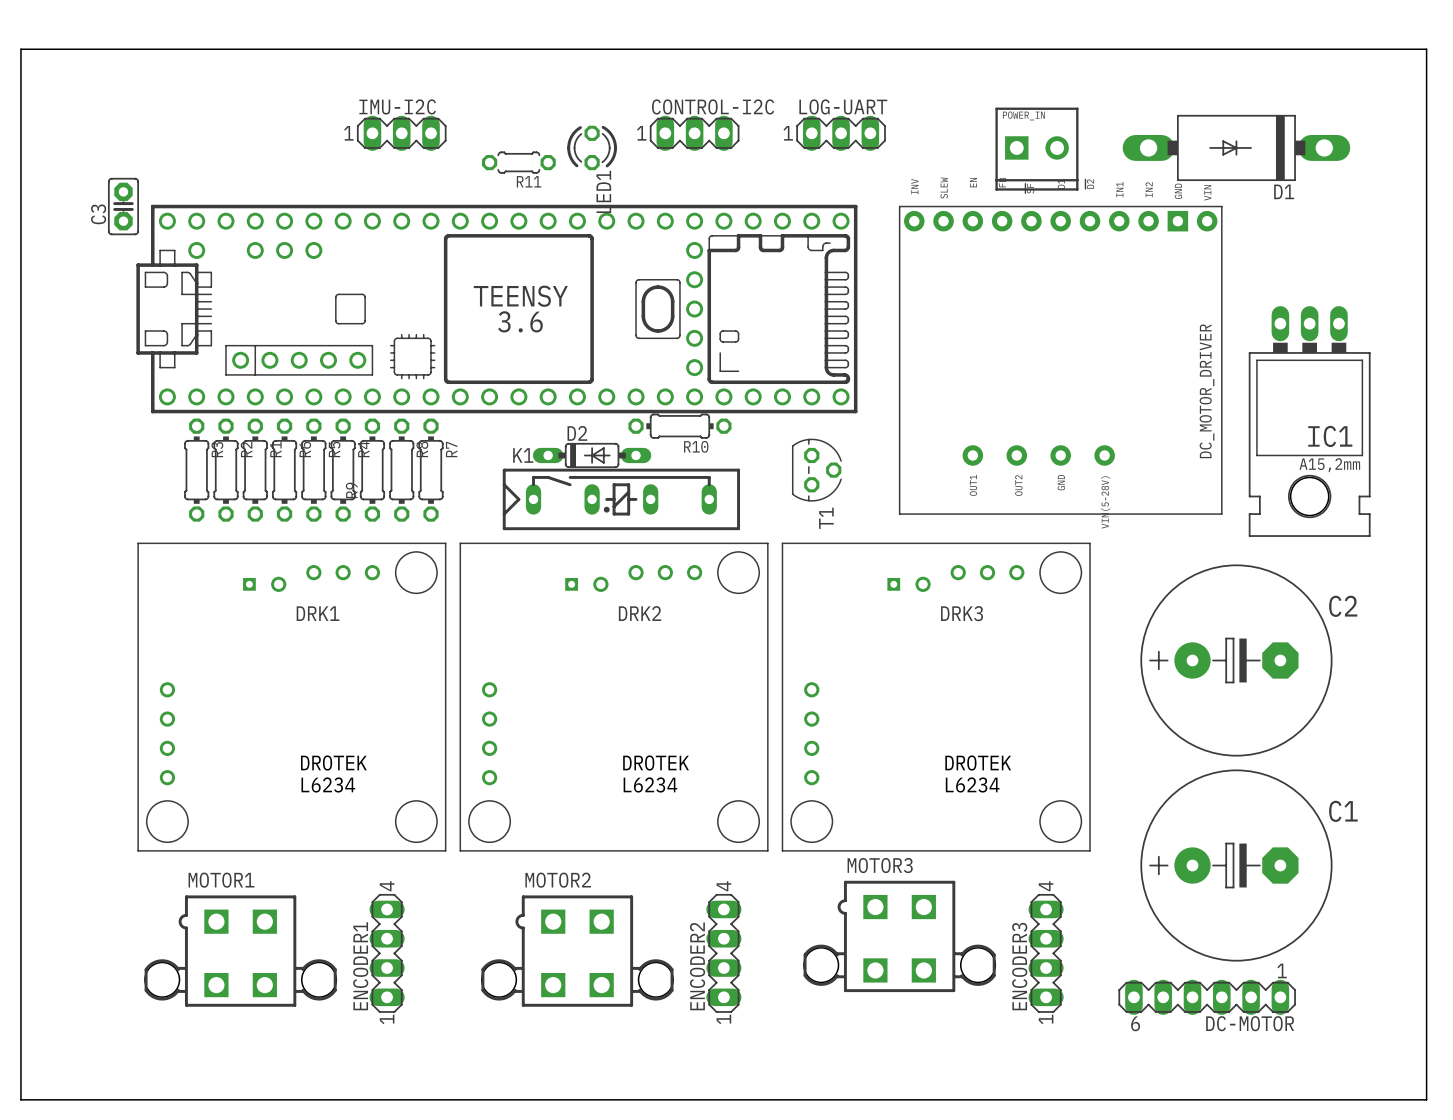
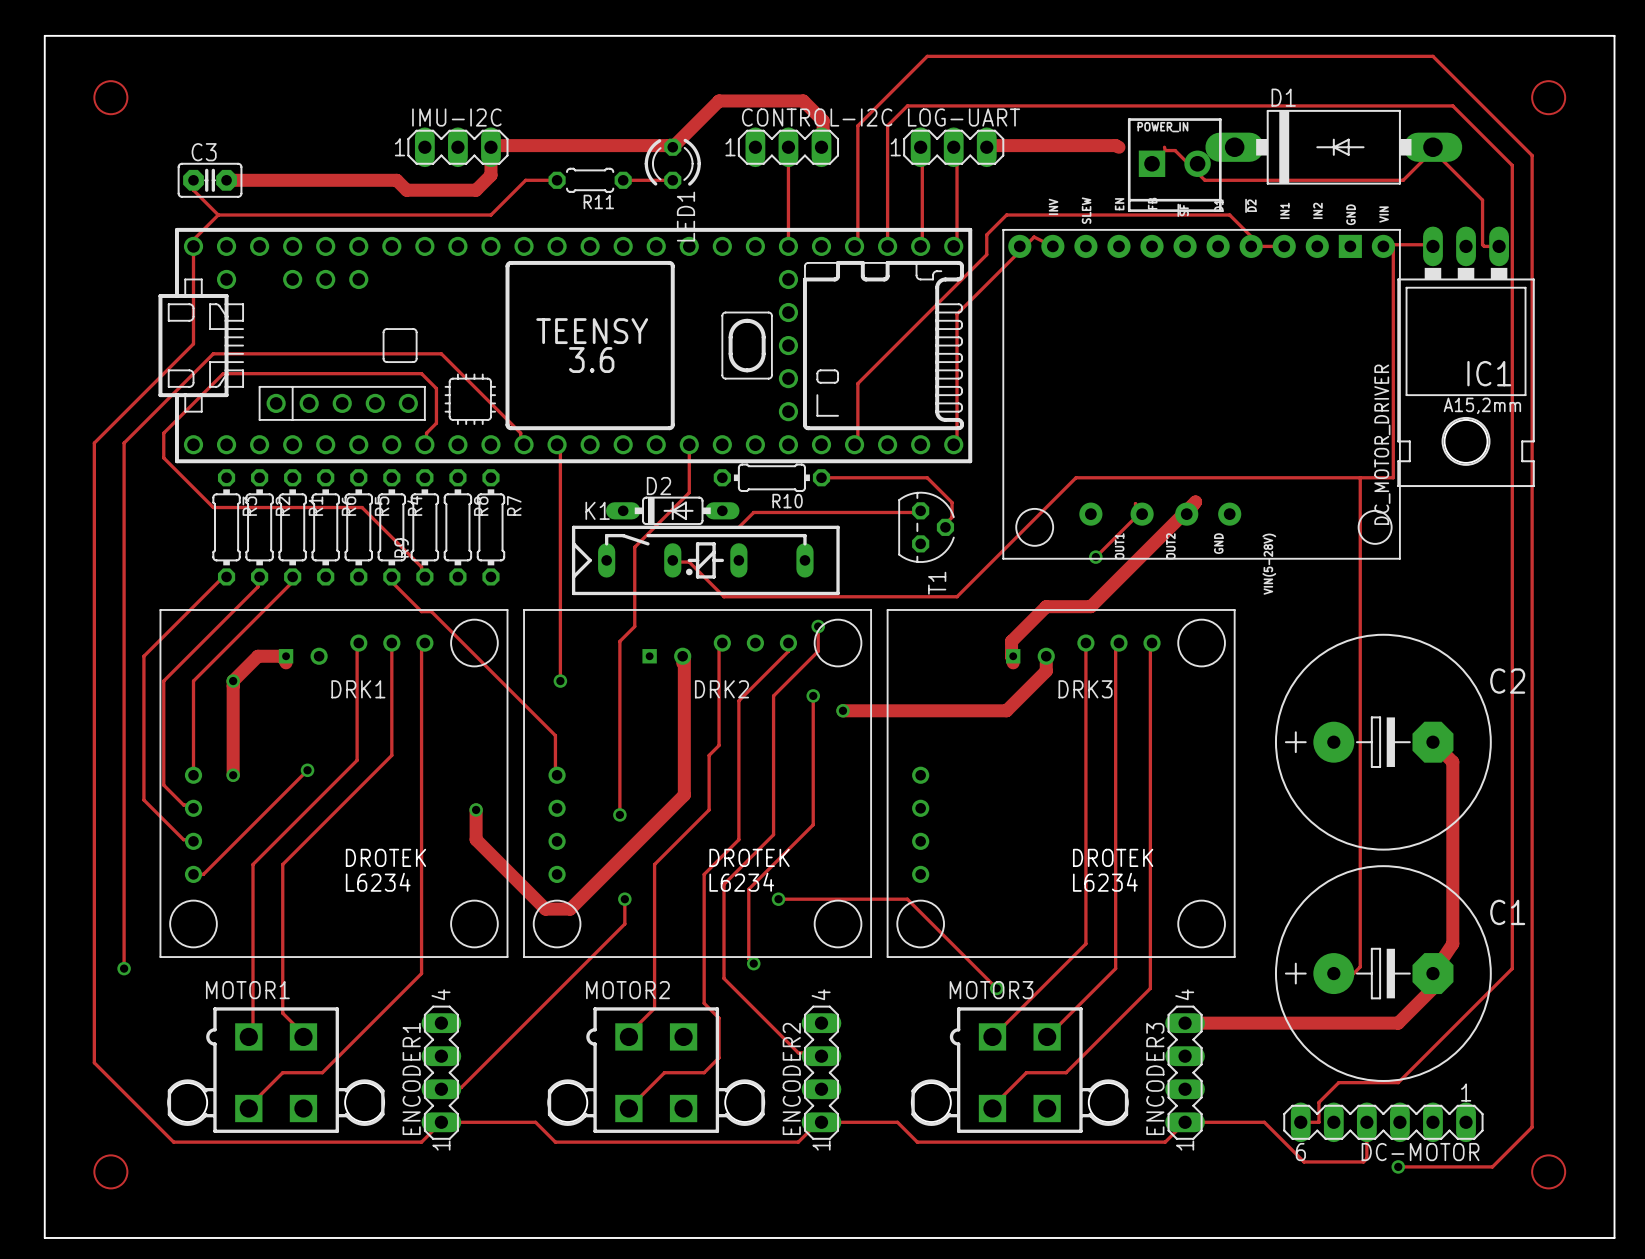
board edge: (1426, 49) (20, 49) (20, 1099) (35, 1099) -> (1614, 52) (1614, 35) (44, 35) (44, 1237)
drawing: none -> [93, 80, 129, 116]
drawing: none -> [1531, 80, 1567, 116]
track: none -> (788, 147) (788, 246)
track: none -> (821, 147) (823, 145) (823, 120) (803, 100) (719, 100) (672, 147) (669, 145) (490, 145) (490, 175) (476, 190) (406, 190) (396, 180) (226, 180)
track: none -> (920, 147) (922, 150) (922, 244) (920, 246)
track: none -> (953, 147) (957, 150) (957, 244) (953, 246)
track: none -> (986, 147) (986, 145) (1115, 145) (1118, 147)
track: none -> (1164, 147) (1165, 150) (1175, 150) (1204, 180) (1403, 180) (1432, 150)
track: none -> (1432, 150) (1482, 200) (1482, 244) (1499, 246)
D1 rotation: 0° (1236, 147) -> 180° (1333, 147)
track: none -> (193, 180) (193, 190) (218, 215)
track: none -> (557, 180) (525, 180) (490, 215) (218, 215)
track: none -> (623, 180) (672, 180)
track: none -> (218, 215) (193, 239) (193, 343) (94, 443) (94, 1062) (173, 1142) (421, 1142) (441, 1122) (535, 1122) (555, 1142) (798, 1142) (818, 1122) (897, 1122) (917, 1142) (1165, 1142) (1185, 1122) (1264, 1122) (1304, 1161) (1363, 1161) (1366, 1158) (1366, 1122)
DC_MOTOR_DRIVER footprint: [898, 205, 1223, 515] -> [1002, 229, 1401, 560]
C3 rotation: 0° (123, 206) -> 90° clockwise (210, 180)
C3 position: (123, 206) -> (210, 180)
track: none -> (1393, 244) (1393, 477) (1076, 477) (957, 596) (724, 596) (689, 562) (672, 560)
track: none -> (854, 246) (857, 244) (857, 125) (927, 56) (1432, 56) (1532, 155) (1532, 1127) (1492, 1166) (1398, 1166)
track: none -> (887, 246) (887, 125) (907, 105) (1452, 105) (1512, 165) (1512, 968) (1398, 1082) (1338, 1082) (1318, 1102) (1318, 1122) (1300, 1122)
track: none -> (1052, 246) (1034, 237) (957, 314) (957, 443) (953, 444)
track: none -> (1284, 246) (1261, 246) (1229, 215) (1006, 215) (986, 234) (986, 254) (857, 383) (857, 443) (854, 444)
track: none -> (1383, 246) (1386, 244) (1429, 244) (1432, 246)
track: none -> (424, 444) (426, 433) (436, 423) (436, 388) (421, 373) (223, 373) (163, 433) (163, 457) (213, 507) (362, 507) (421, 567) (421, 576) (424, 576)
track: none -> (524, 444) (520, 443) (520, 433) (441, 353) (213, 353) (124, 443) (124, 968)
track: none -> (557, 444) (560, 448) (560, 681)
track: none -> (689, 444) (689, 492) (634, 547) (634, 626) (619, 641) (619, 814)
IC1 position: (1309, 421) -> (1466, 356)
track: none -> (821, 477) (927, 477) (952, 502) (952, 517) (945, 527)
track: none -> (1360, 477) (1360, 966) (1353, 973) (1333, 973)
track: none -> (920, 510) (917, 512) (753, 512) (738, 527)
track: none -> (1142, 514) (1135, 503) (1135, 517) (1095, 557)
track: none -> (1186, 514) (1195, 501) (1090, 606) (1046, 606) (1011, 641) (1013, 662)
via: none -> (1095, 557)
track: none -> (226, 576) (223, 576) (143, 656) (143, 800) (183, 839) (193, 839) (193, 841)
track: none -> (259, 576) (257, 576) (257, 586) (163, 681) (163, 785) (183, 804) (193, 804) (193, 808)
track: none -> (292, 576) (292, 581) (193, 681) (193, 775)
track: none -> (391, 576) (391, 581) (421, 611) (431, 611) (555, 735) (555, 775) (557, 775)
track: none -> (818, 626) (818, 651) (773, 695) (773, 834) (724, 884) (724, 978) (798, 1052) (818, 1052) (821, 1056)
via: none -> (818, 626)
track: none -> (391, 646) (391, 755) (282, 864) (282, 1013) (302, 1033) (303, 1036)
track: none -> (788, 646) (788, 651) (738, 700) (738, 839) (704, 874) (704, 1003) (719, 1018) (719, 1057) (704, 1072) (664, 1072) (628, 1108)
track: none -> (1085, 646) (1085, 943) (992, 1036)
track: none -> (358, 649) (357, 646) (357, 760) (253, 864) (253, 1033) (248, 1036)
track: none -> (424, 649) (421, 646) (421, 973) (322, 1072) (282, 1072) (248, 1108)
track: none -> (722, 649) (719, 646) (719, 745) (709, 755) (709, 809) (654, 864) (654, 1008) (629, 1033) (628, 1036)
track: none -> (1118, 649) (1115, 646) (1115, 968) (1047, 1036)
track: none -> (1152, 649) (1150, 646) (1150, 988) (1066, 1072) (1026, 1072) (992, 1108)
track: none -> (286, 662) (282, 656) (257, 656) (233, 681) (233, 775)
track: none -> (682, 662) (684, 656) (684, 795) (570, 909) (545, 909) (476, 839) (476, 809)
track: none -> (1046, 662) (1046, 671) (1006, 710) (842, 710)
via: none -> (233, 681)
via: none -> (560, 681)
track: none -> (813, 695) (813, 824) (748, 889) (748, 958) (753, 963)
via: none -> (813, 695)
via: none -> (842, 710)
C2 position: (1236, 660) -> (1383, 742)
track: none -> (1432, 742) (1452, 762) (1452, 943) (1432, 973) (1432, 988) (1398, 1023) (1185, 1023)
track: none -> (307, 770) (203, 874) (193, 874)
via: none -> (307, 770)
via: none -> (233, 775)
via: none -> (476, 809)
via: none -> (619, 814)
track: none -> (624, 899) (624, 923) (461, 1087) (441, 1087) (441, 1089)
via: none -> (624, 899)
track: none -> (778, 899) (907, 899) (996, 988)
via: none -> (778, 899)
via: none -> (753, 963)
via: none -> (124, 968)
C1 position: (1236, 865) -> (1383, 973)
via: none -> (996, 988)
MOTOR3 position: (899, 936) -> (1019, 1070)
DC-MOTOR position: (1207, 997) -> (1383, 1122)
drawing: none -> [93, 1154, 129, 1190]
drawing: none -> [1531, 1154, 1567, 1190]
via: none -> (1398, 1166)

